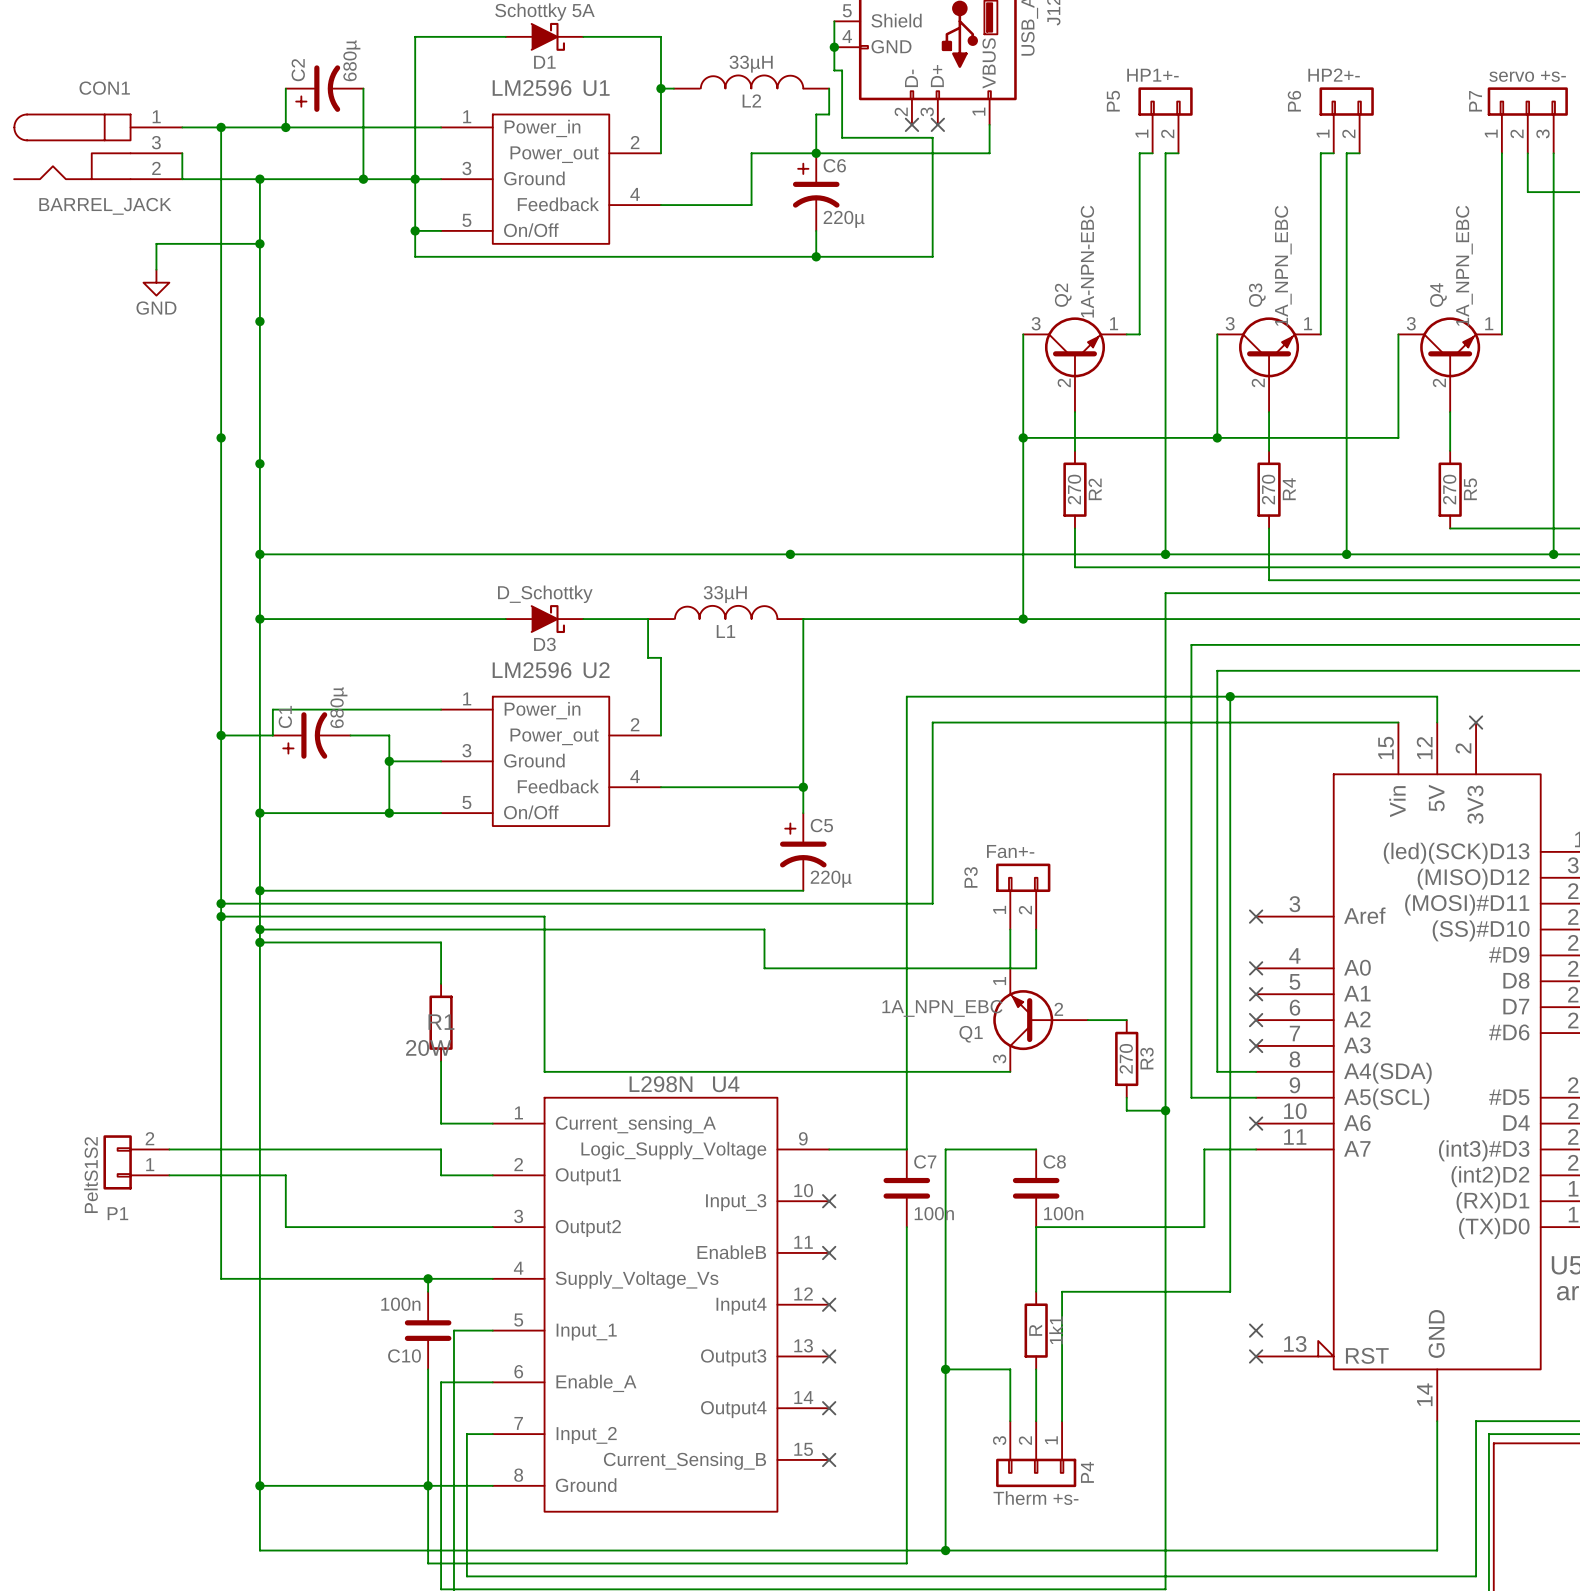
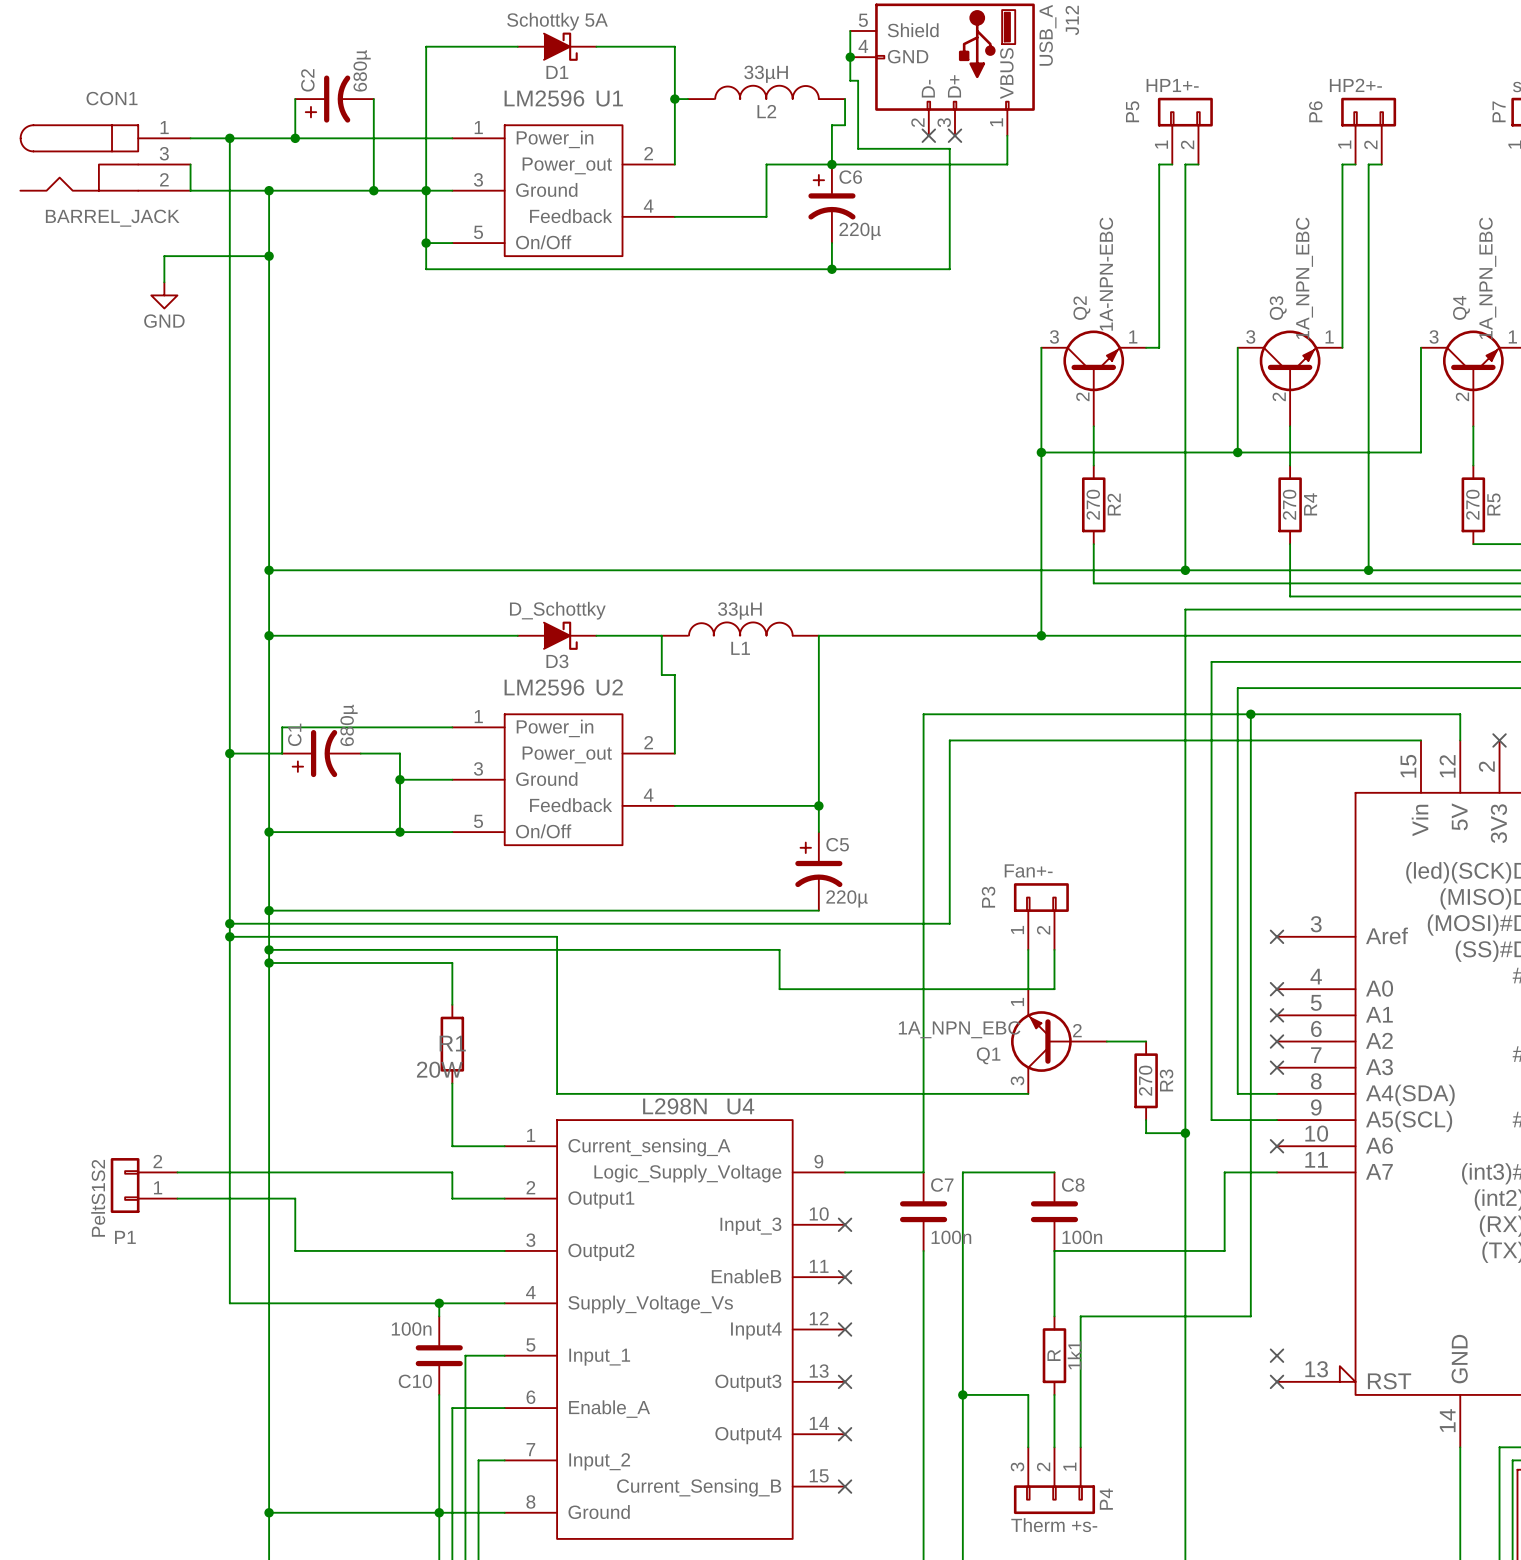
junction: (259, 321) -> none
junction: (221, 437) -> none
junction: (259, 463) -> none
junction: (790, 554) -> none

